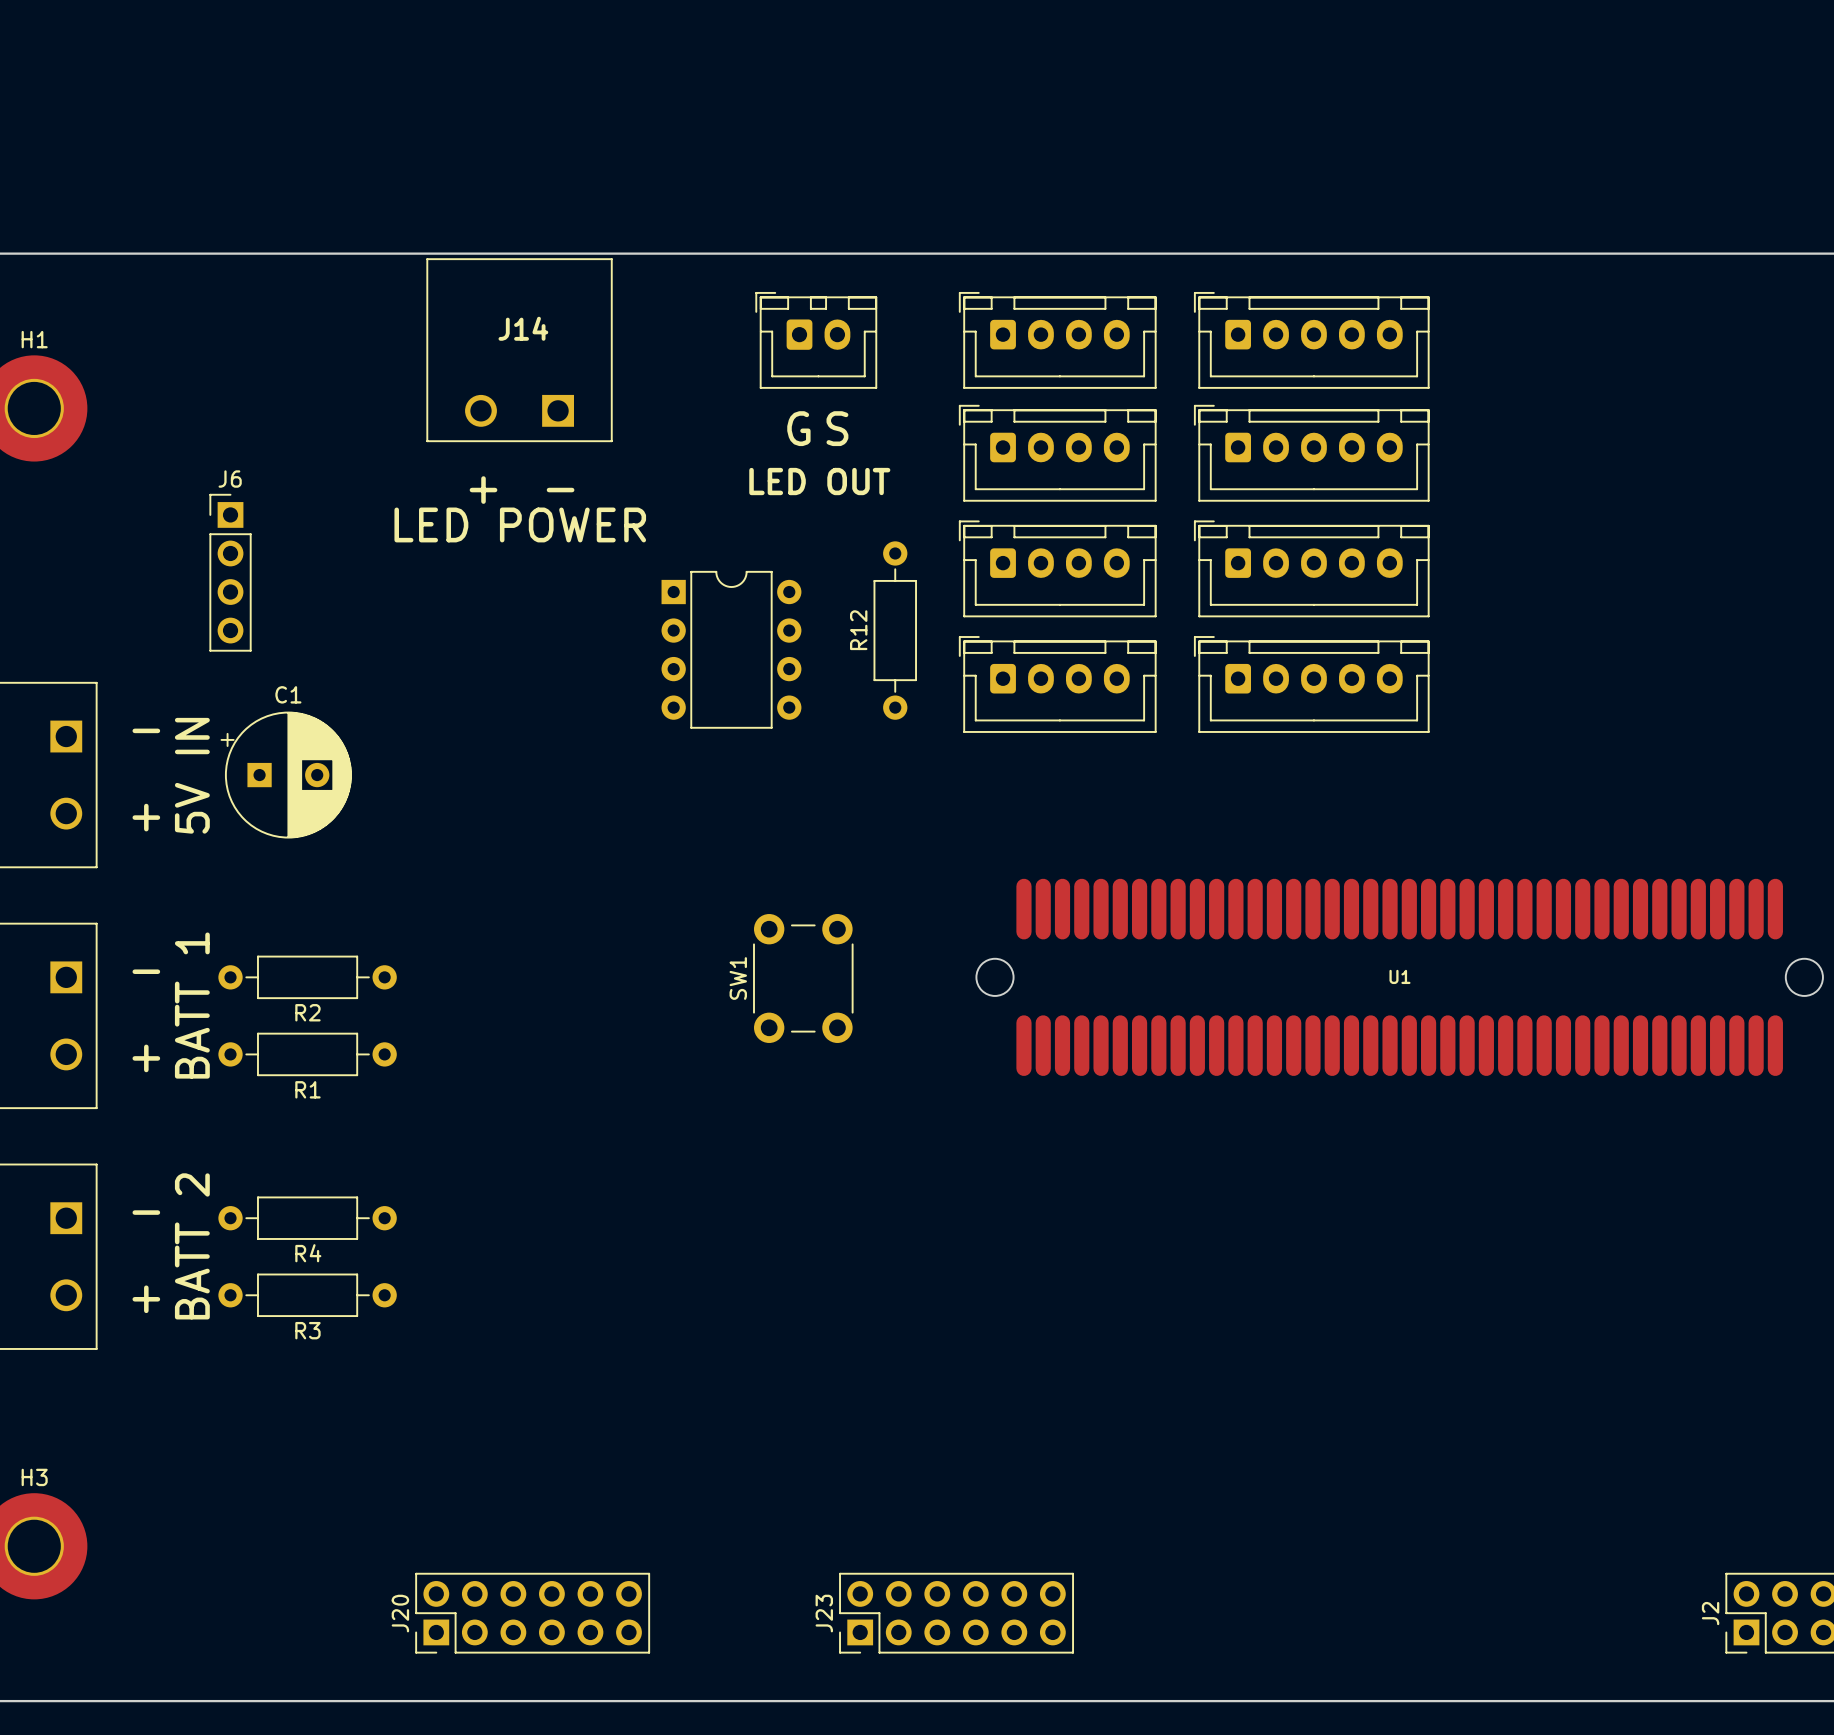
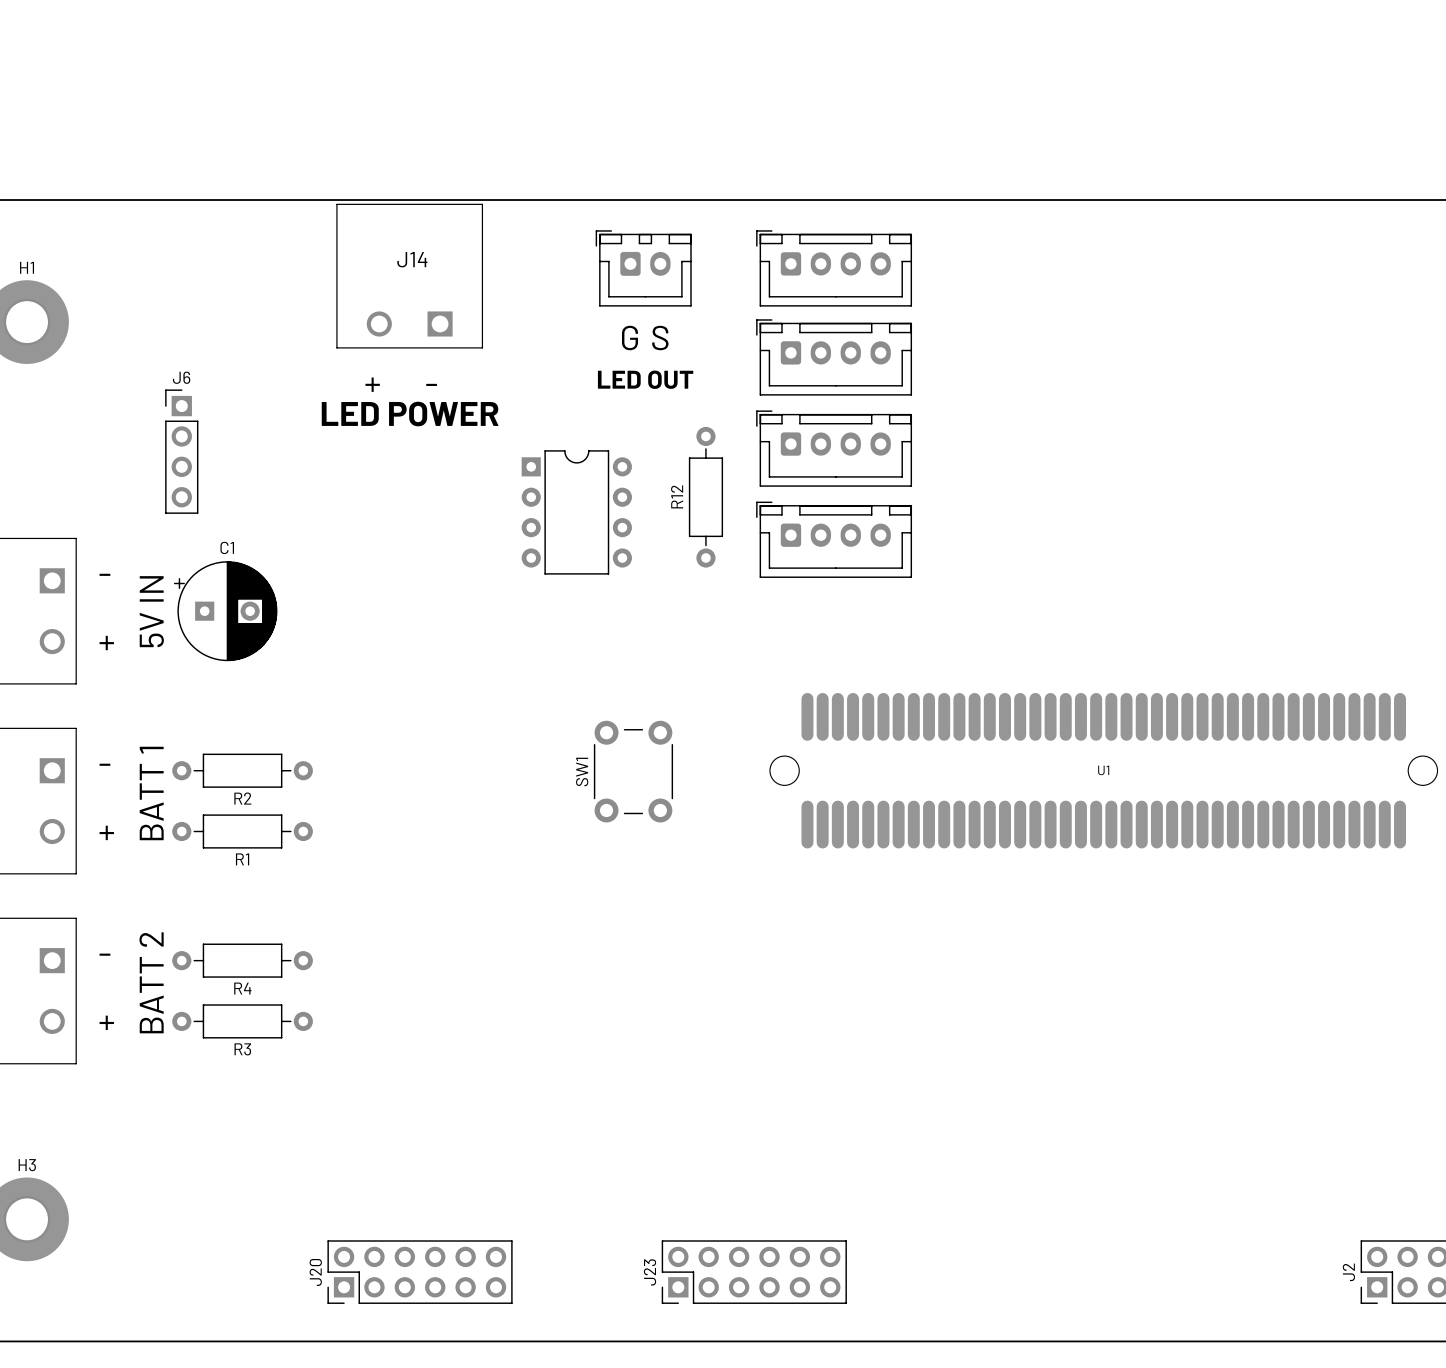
part: (1311, 340) -> none
part: (1311, 453) -> none
part: (1311, 568) -> none
part: (1311, 684) -> none

